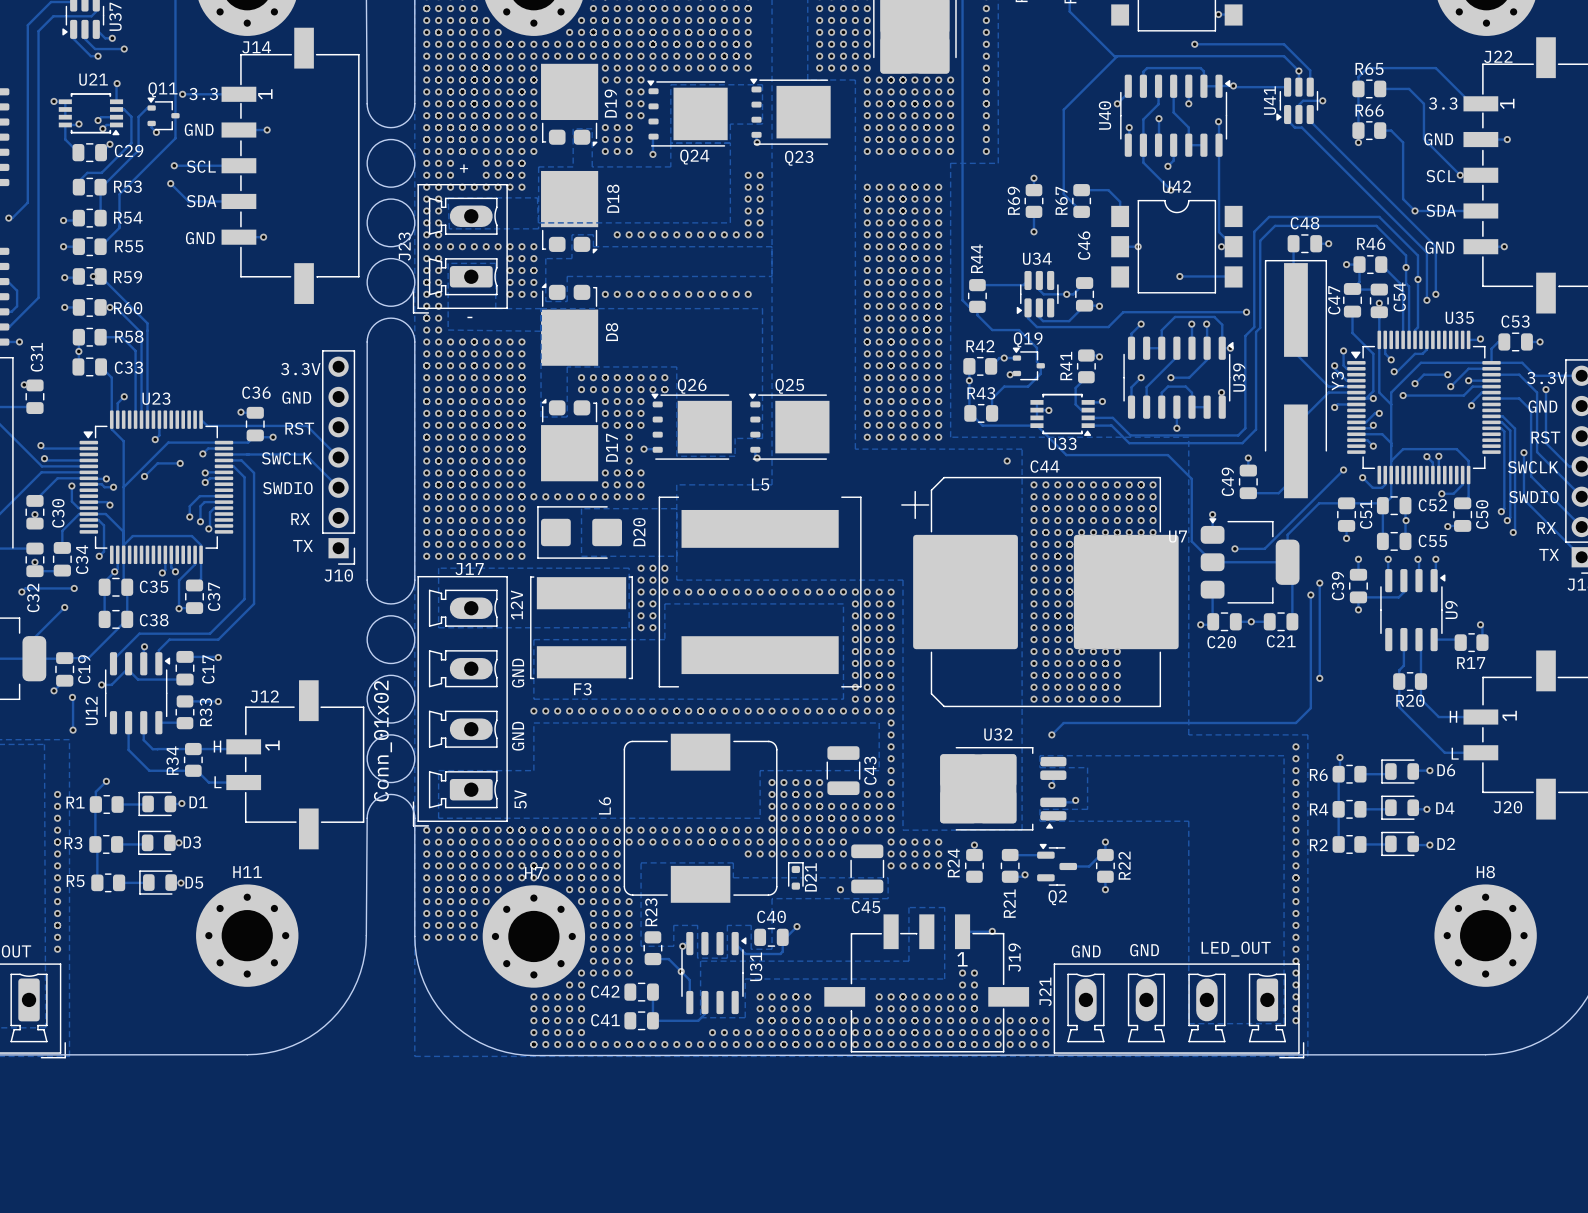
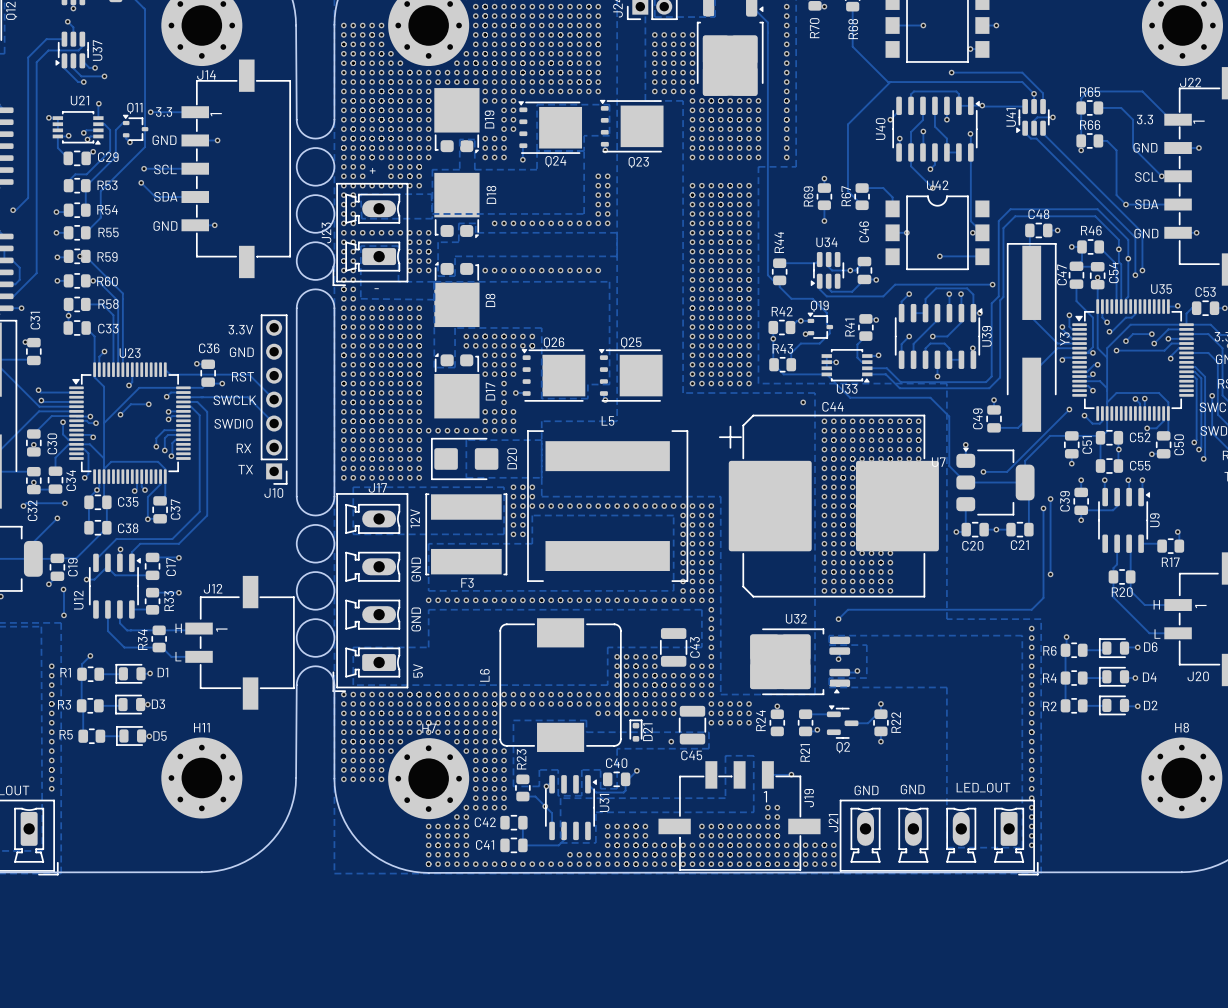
J12 value: Conn_01x02 (383, 741) -> none

